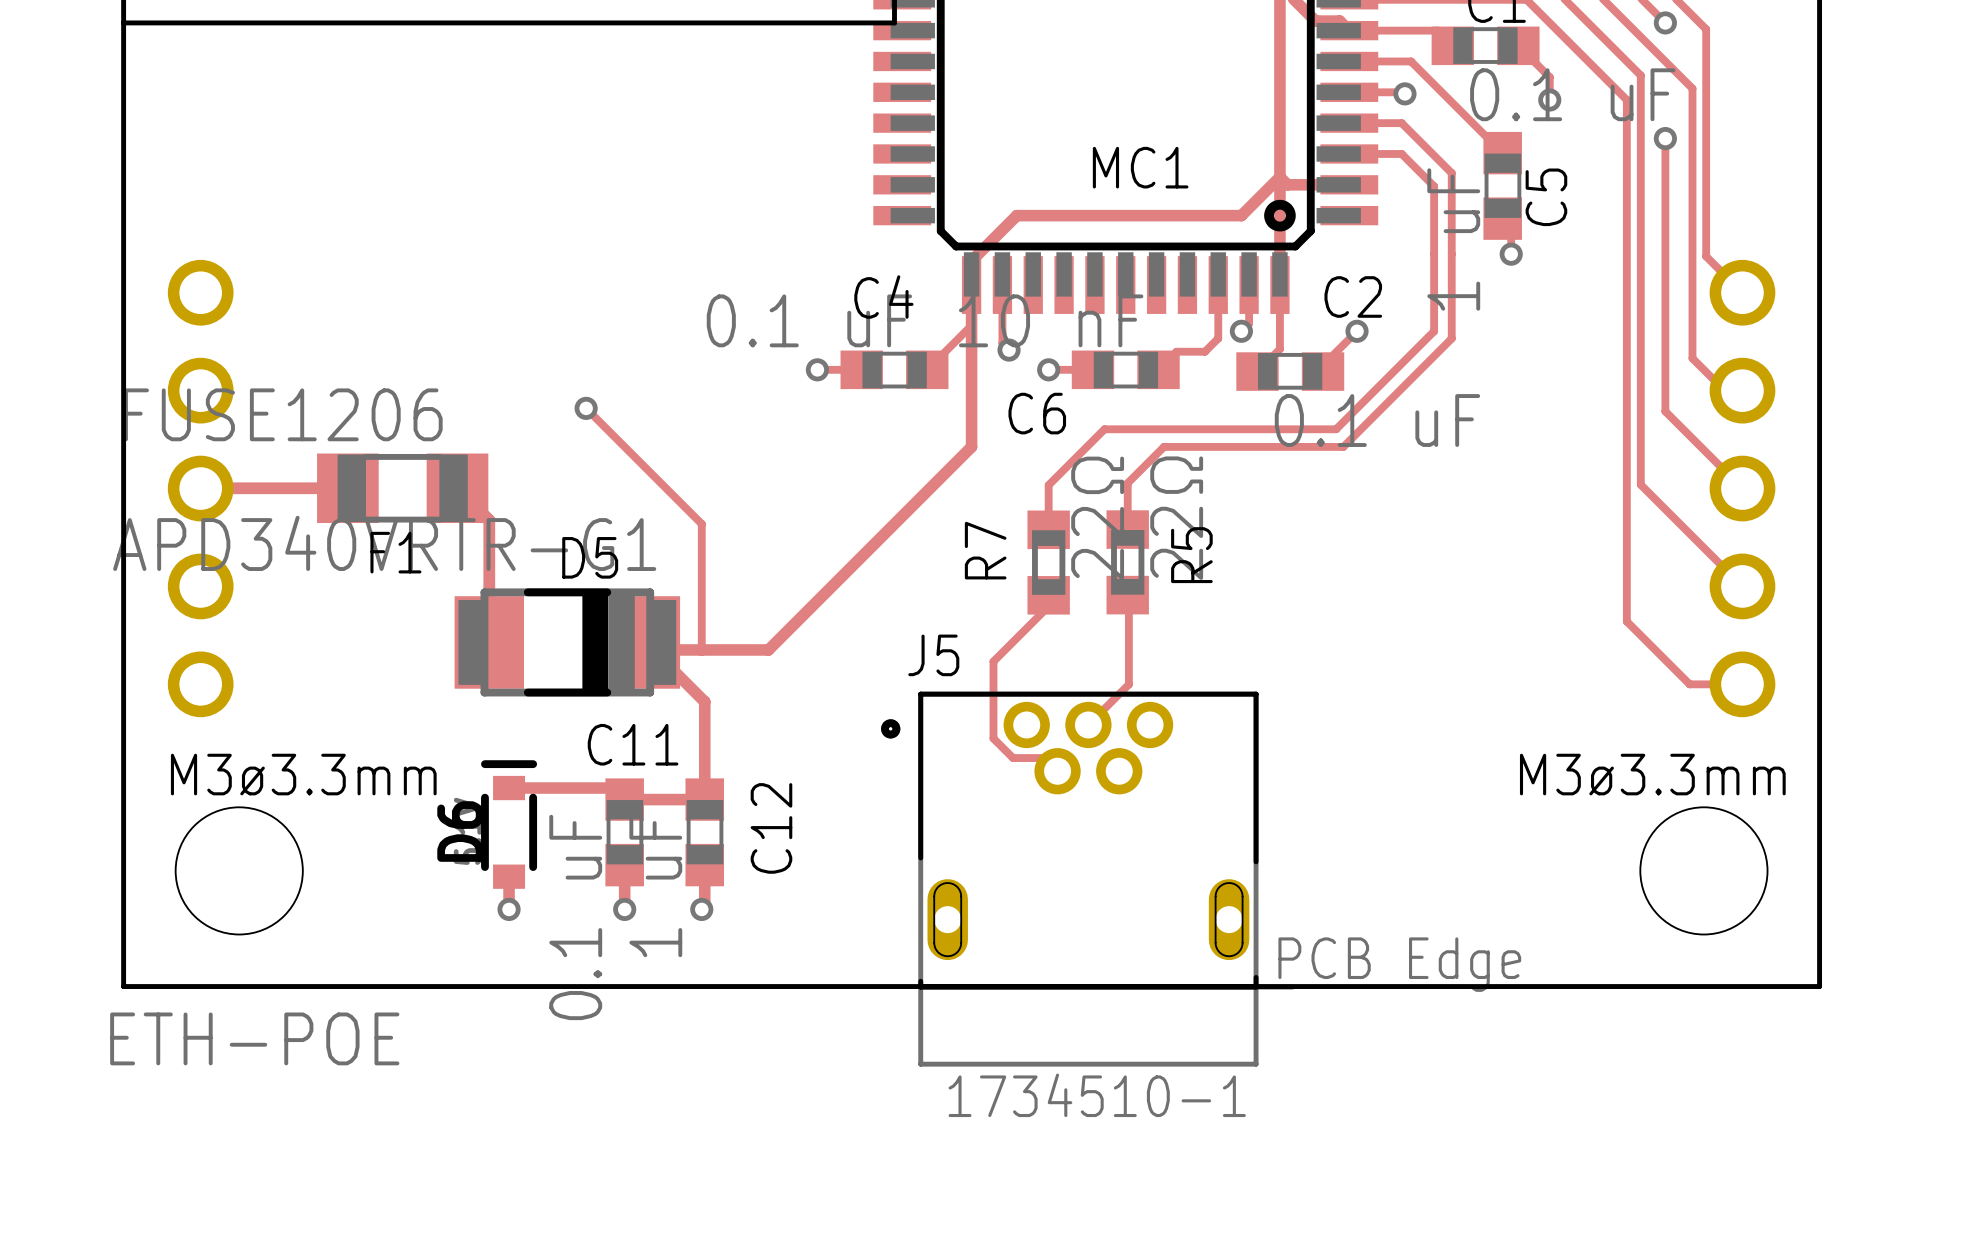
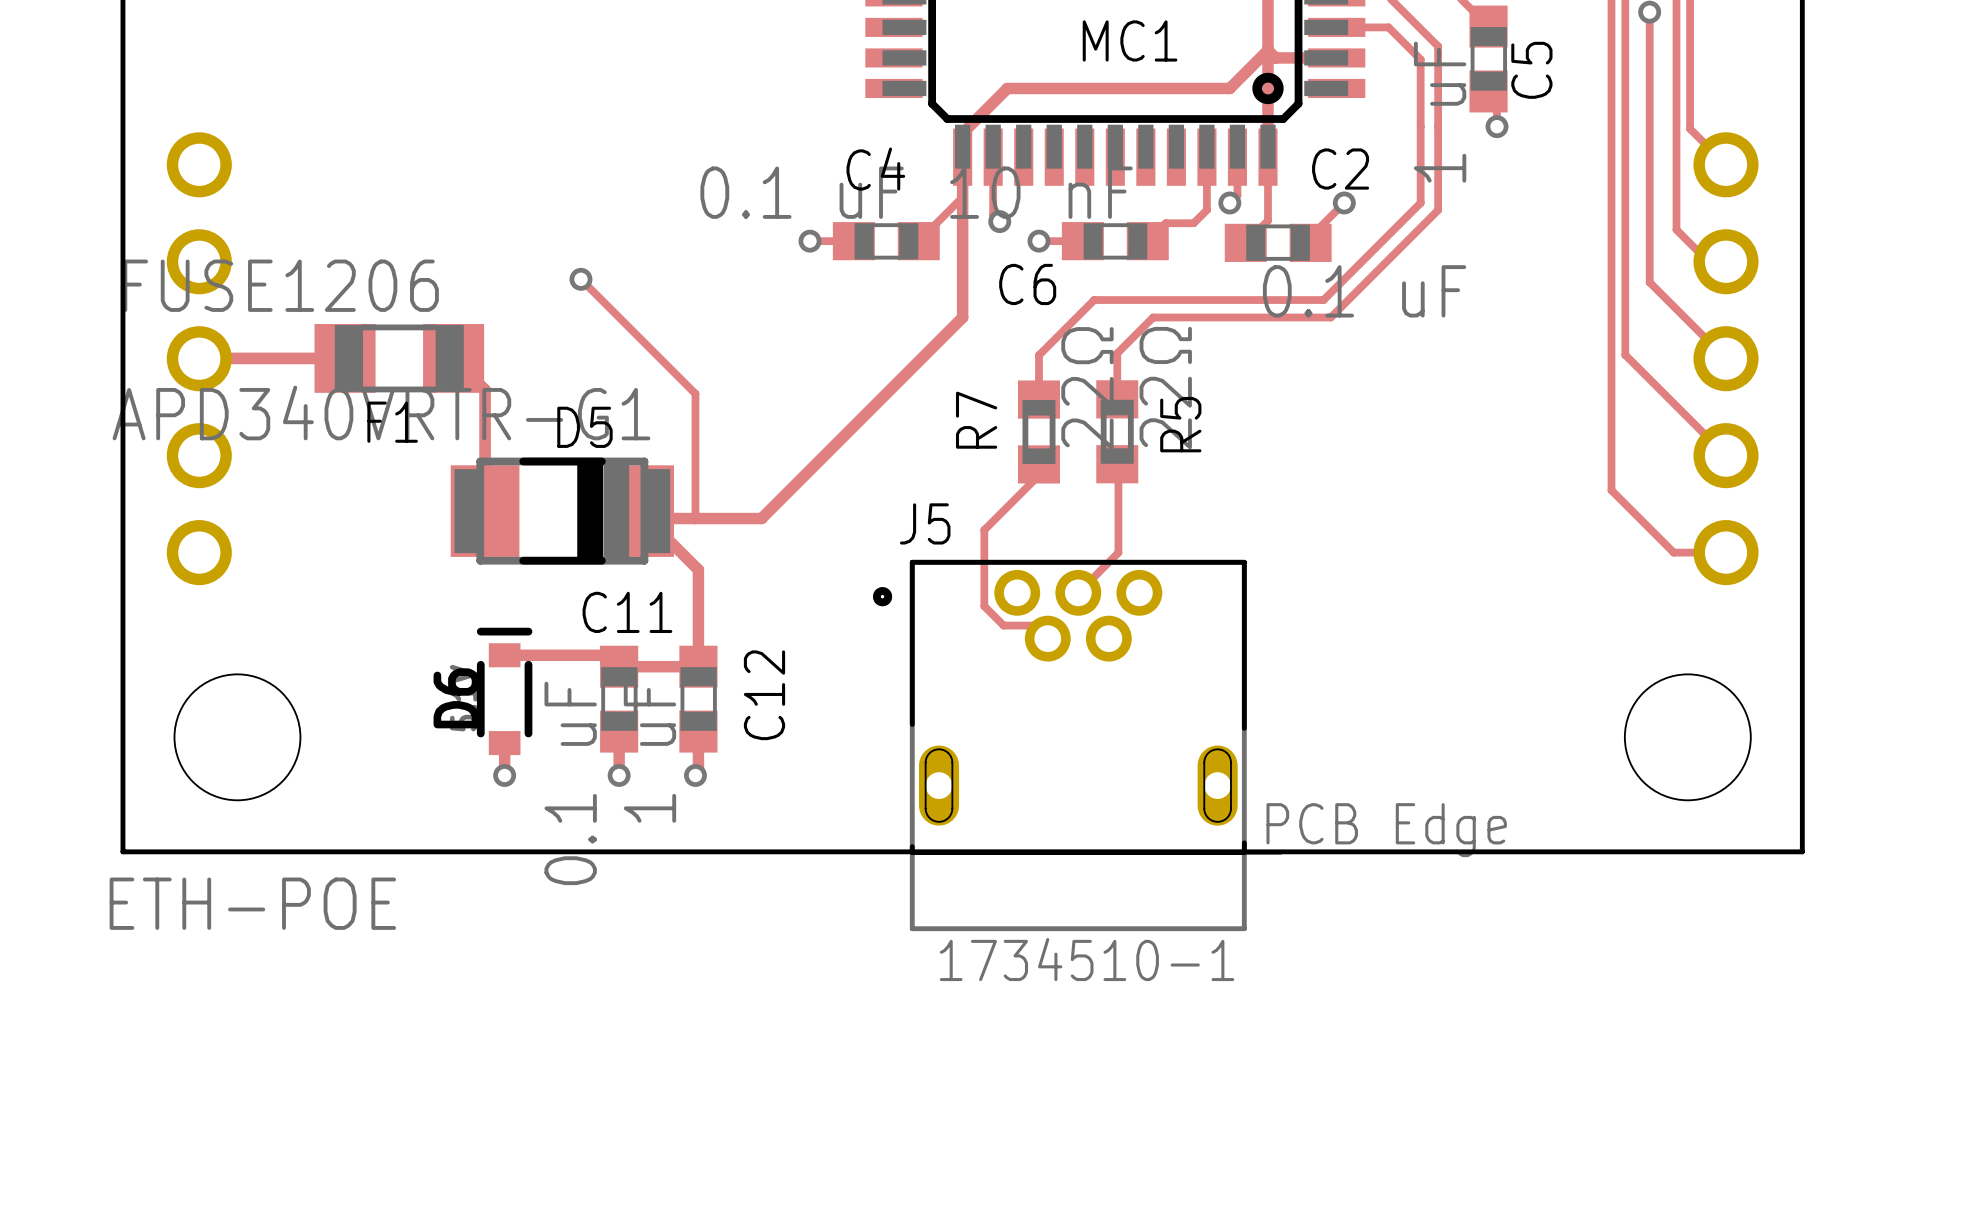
text: M3ø3.3mm (303, 774) -> none
text: M3ø3.3mm (1652, 774) -> none

